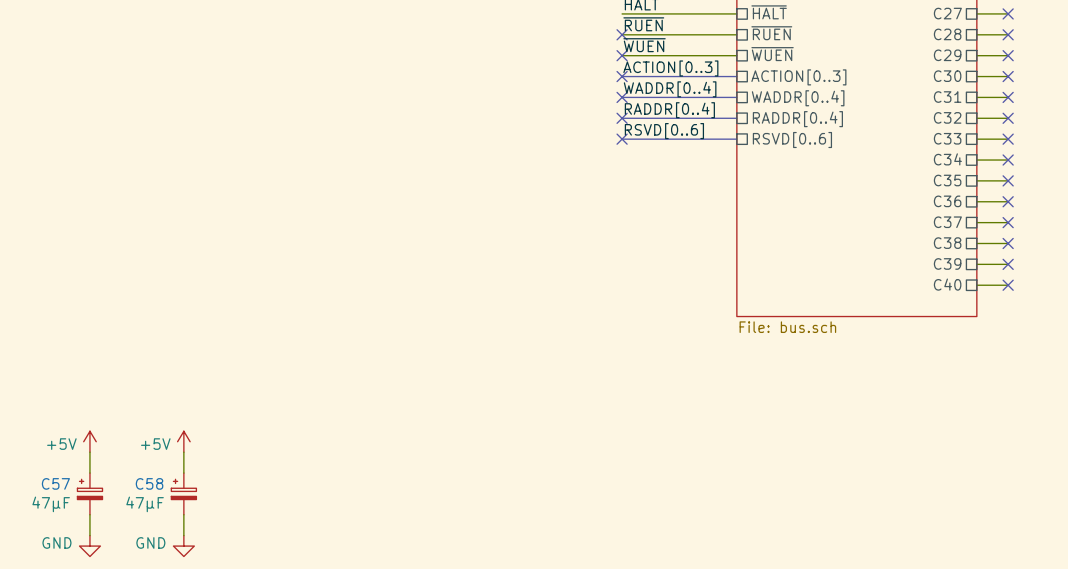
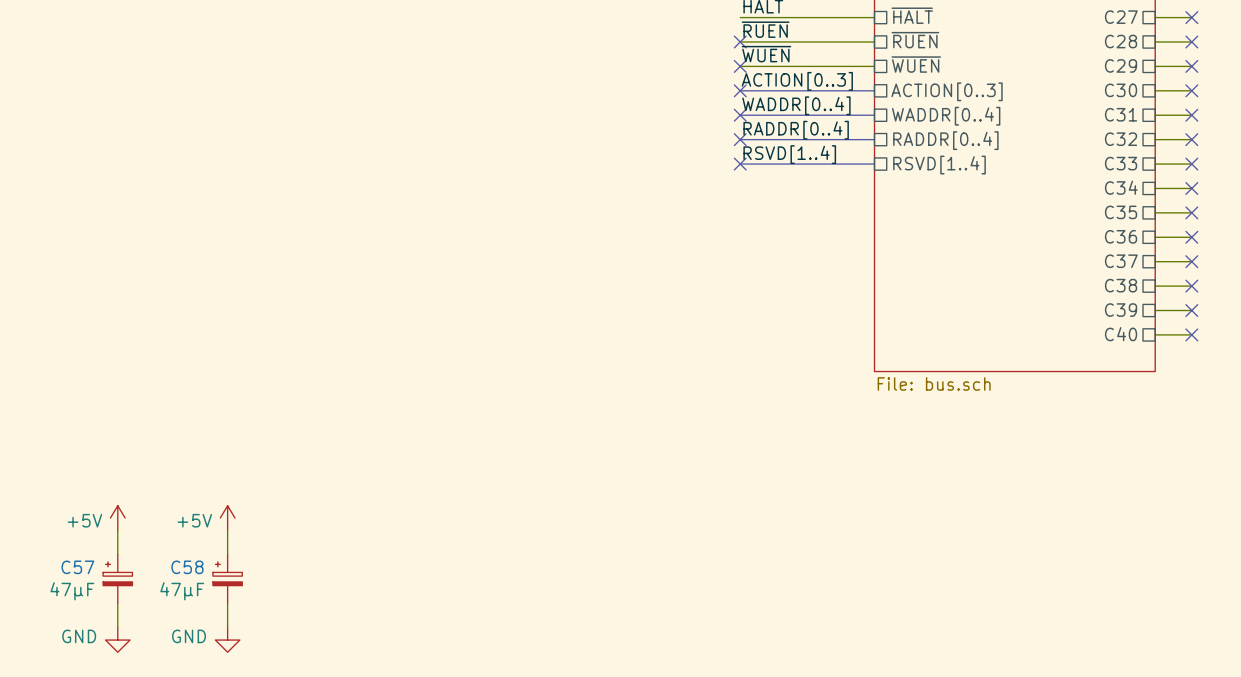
label: RSVD[0..6] (664, 131) -> RSVD[1..4] (789, 154)
sheet pin: RSVD[0..6] (792, 140) -> RSVD[1..4] (939, 165)

